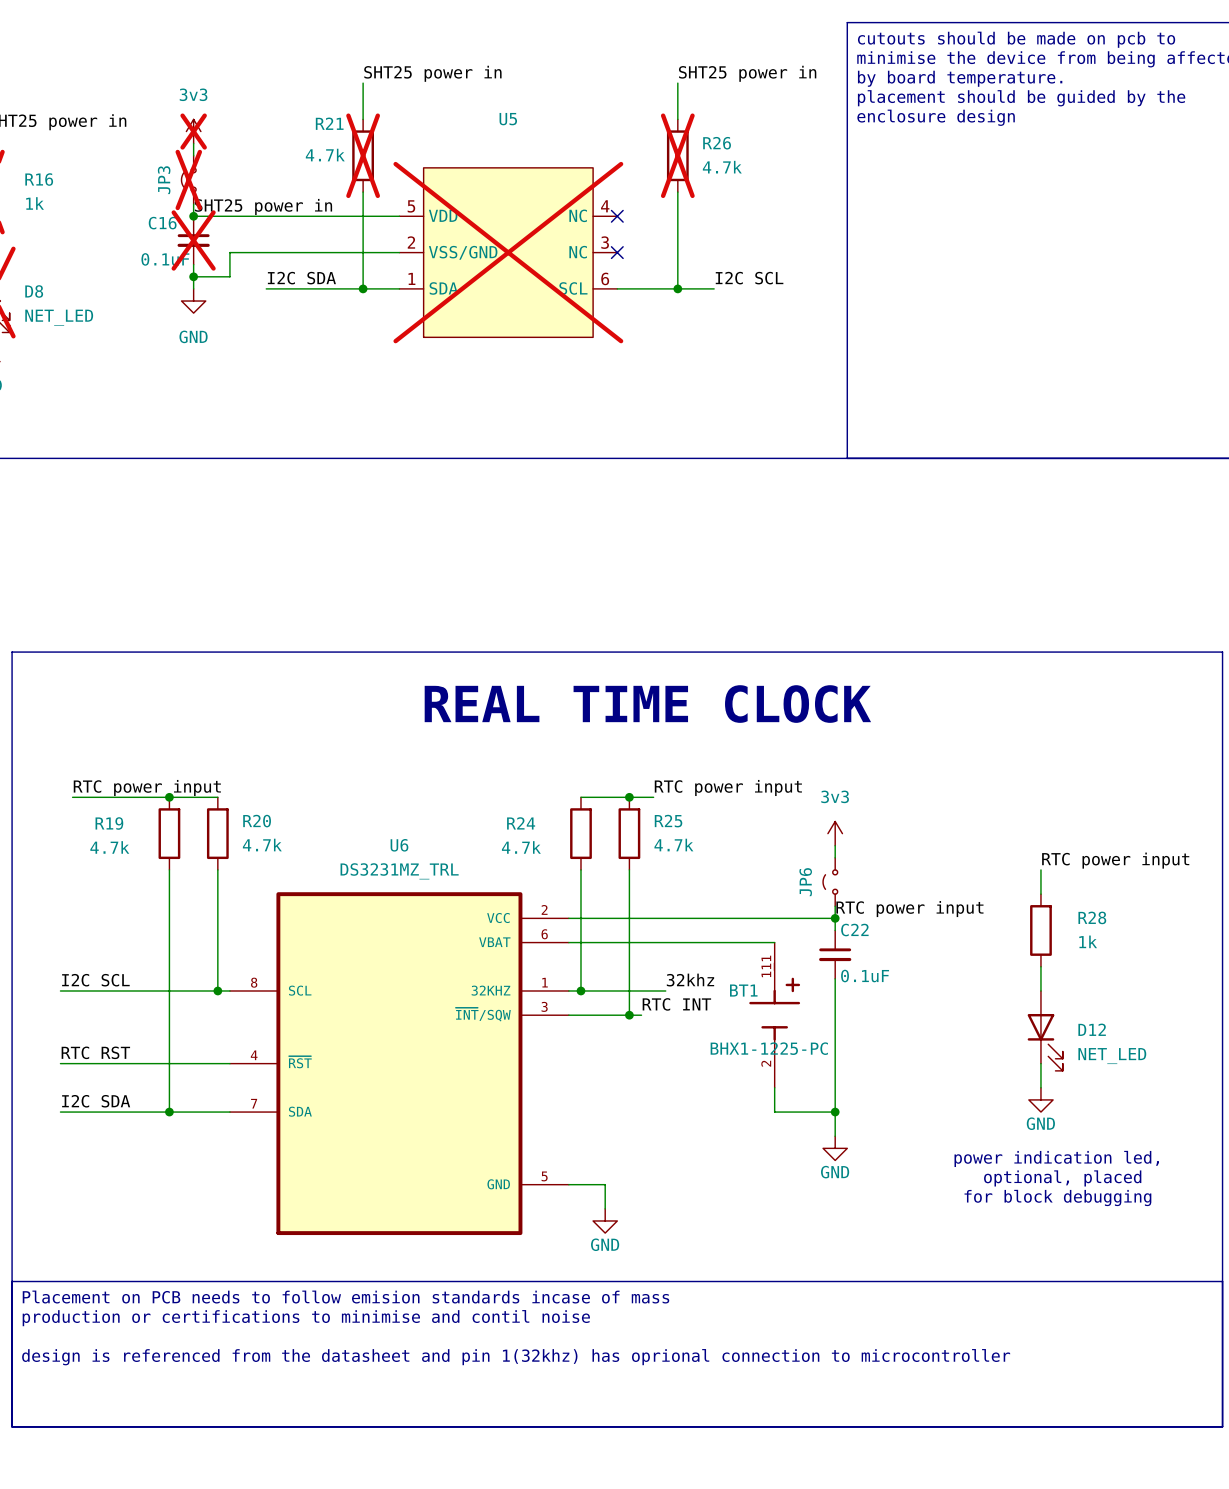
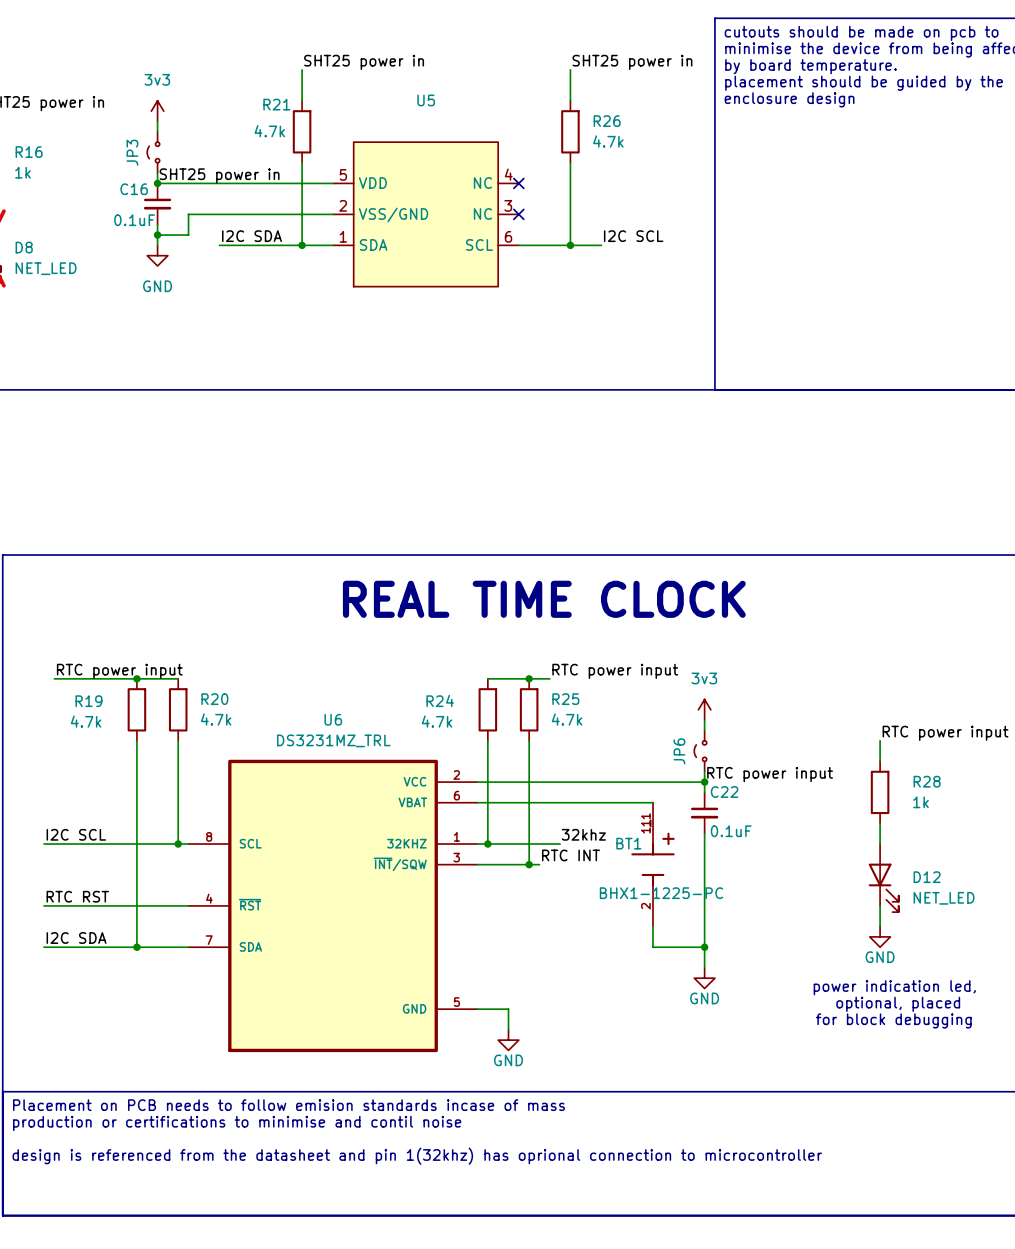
power symbol do-not-place cross: (193, 131) -> none
R21 do-not-place cross: (363, 155) -> none
R26 do-not-place cross: (677, 155) -> none
JP3 do-not-place cross: (188, 179) -> none
C16 do-not-place cross: (193, 240) -> none
U5 do-not-place cross: (508, 252) -> none

